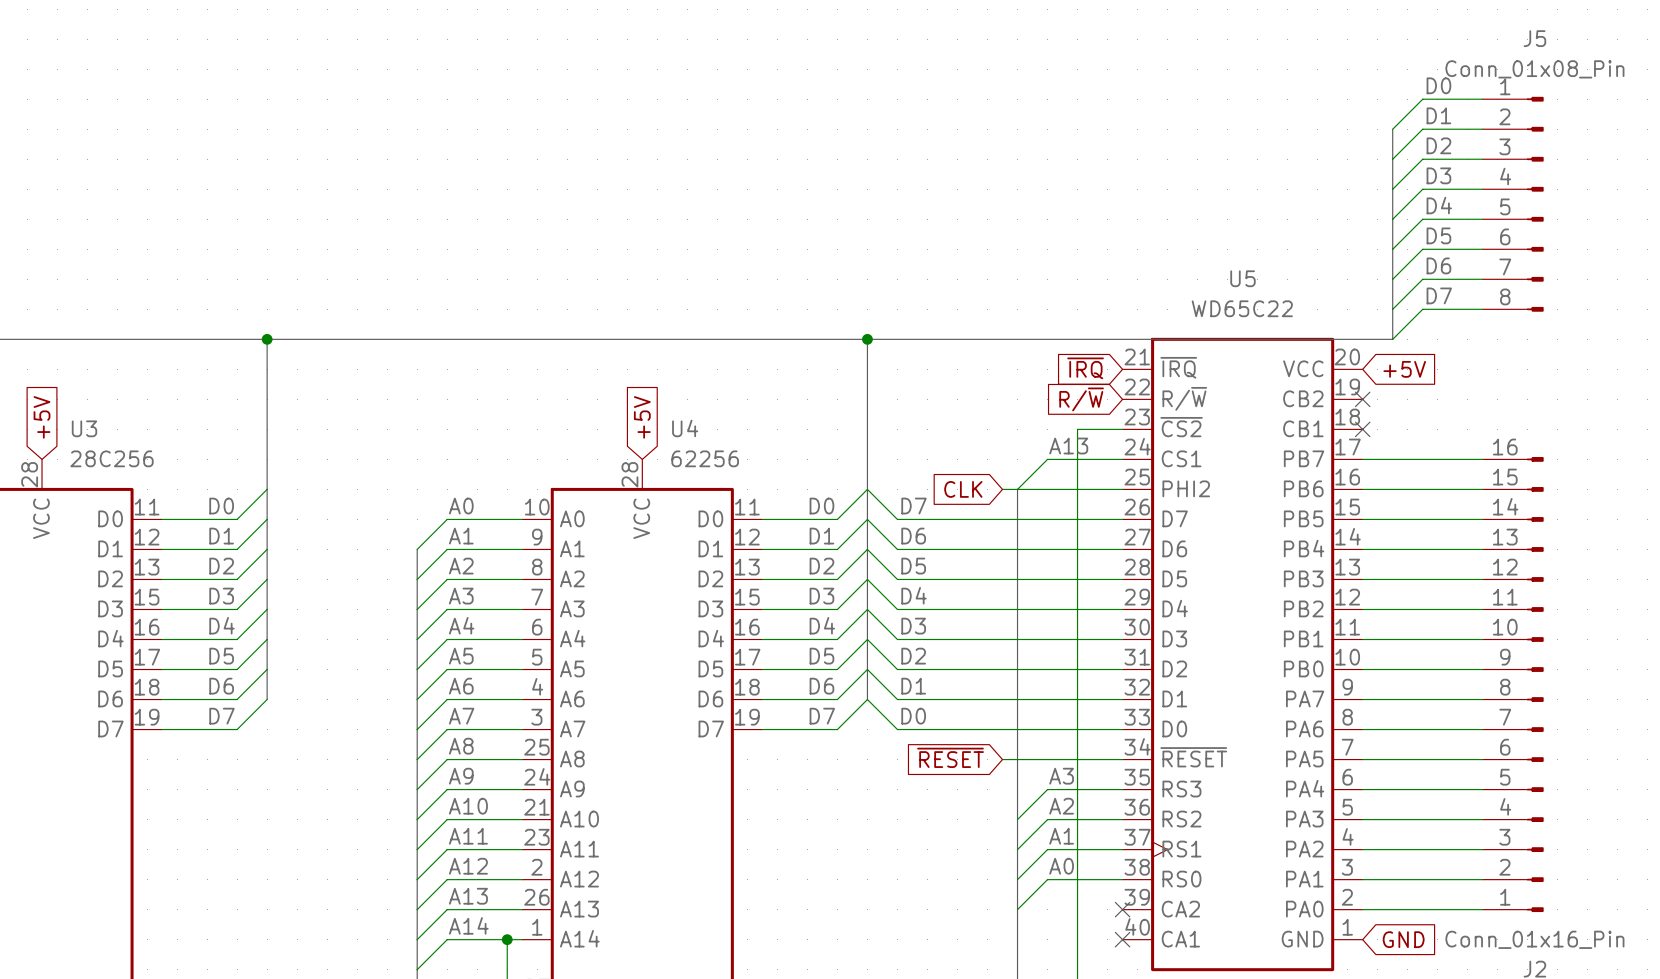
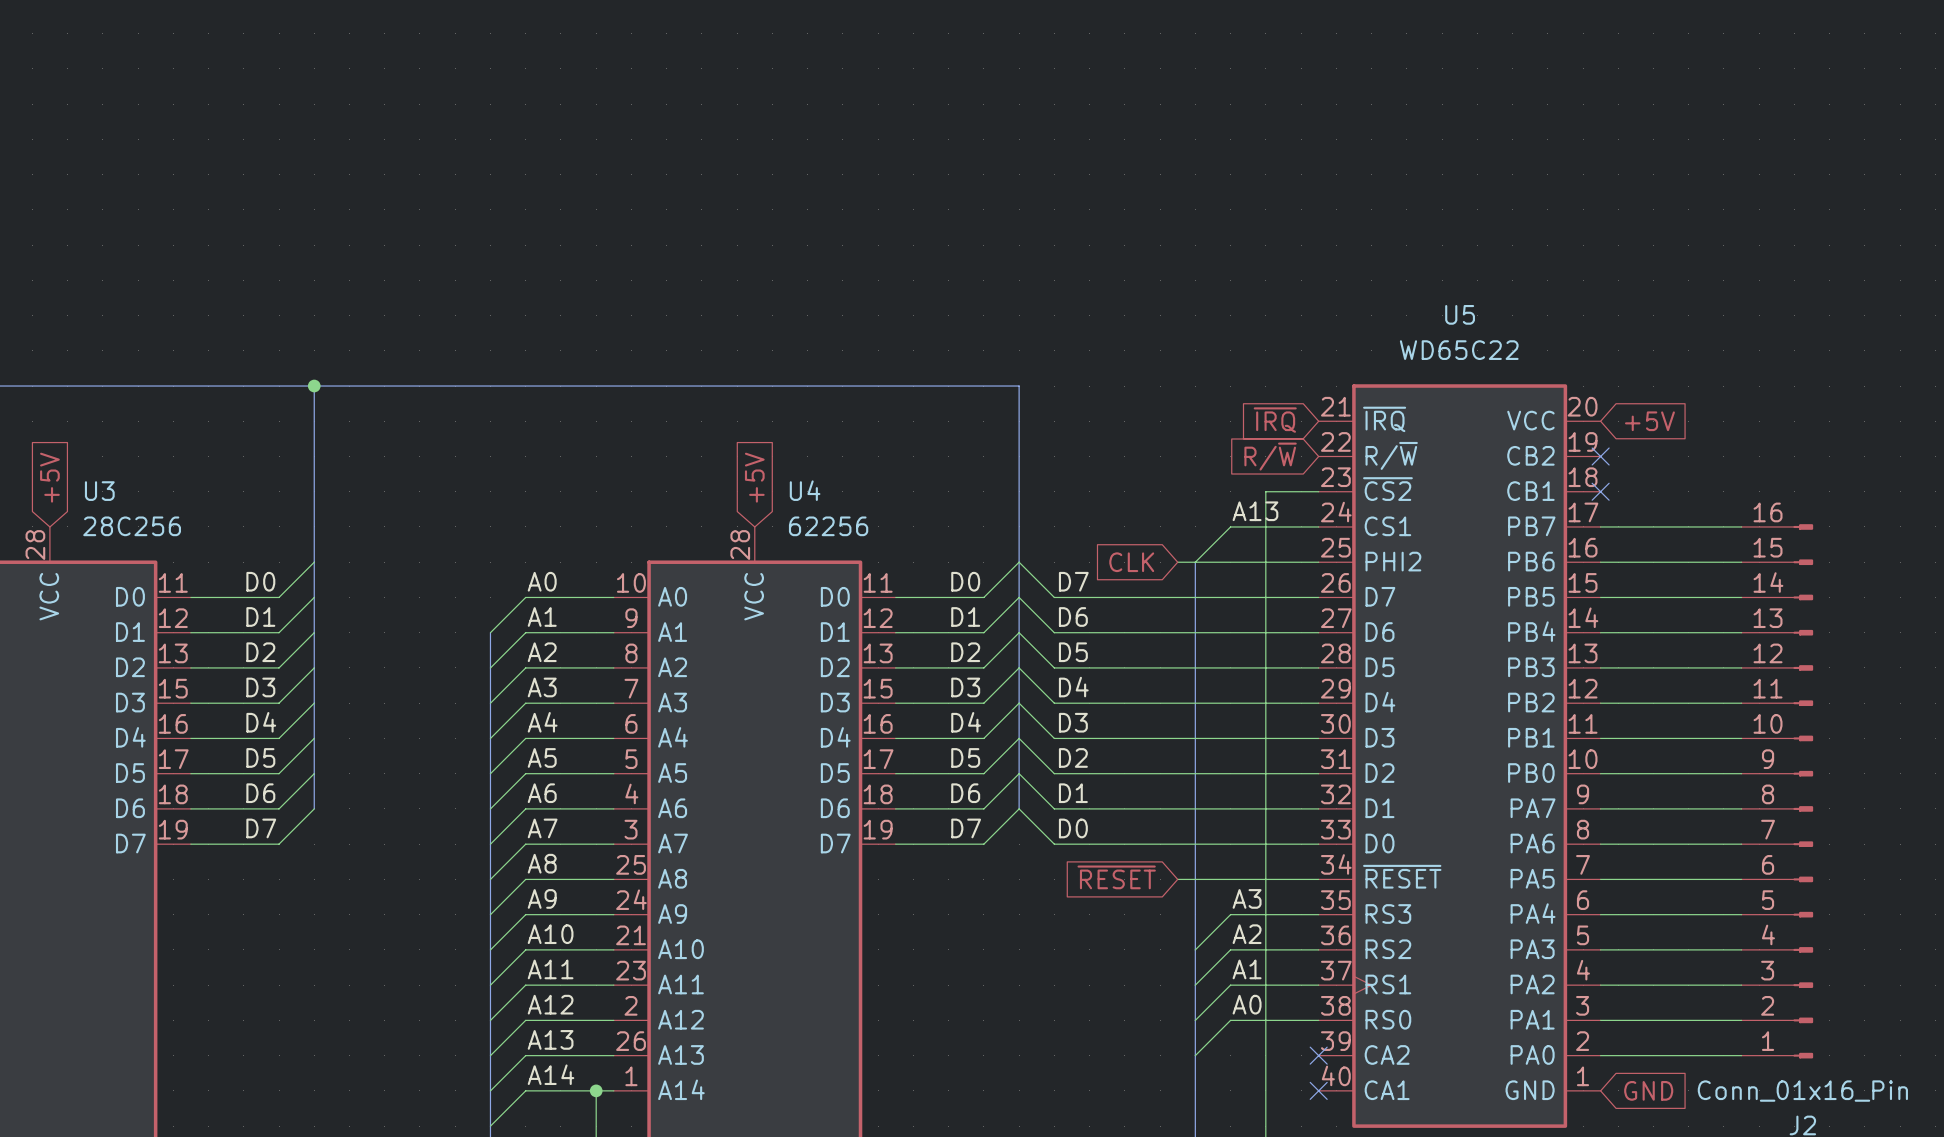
label: D0 (1438, 85) -> none
wire: (1482, 99) (1422, 99) (1392, 129) -> none
label: D1 (1438, 115) -> none
bus: (1392, 129) (1392, 339) (867, 339) -> none
wire: (1482, 129) (1422, 129) (1392, 159) -> none
label: D2 (1438, 145) -> none
wire: (1482, 159) (1422, 159) (1392, 189) -> none
label: D3 (1438, 175) -> none
wire: (1482, 189) (1422, 189) (1392, 219) -> none
J5: Conn_01x08_Pin (1513, 204) -> none
label: D4 (1439, 205) -> none
wire: (1482, 219) (1422, 219) (1392, 249) -> none
label: D5 (1438, 235) -> none
wire: (1482, 249) (1422, 249) (1392, 279) -> none
label: D6 (1438, 265) -> none
wire: (1482, 279) (1422, 279) (1392, 309) -> none
label: D7 (1439, 295) -> none
wire: (1482, 309) (1422, 309) (1392, 339) -> none
junction: (867, 339) -> none

